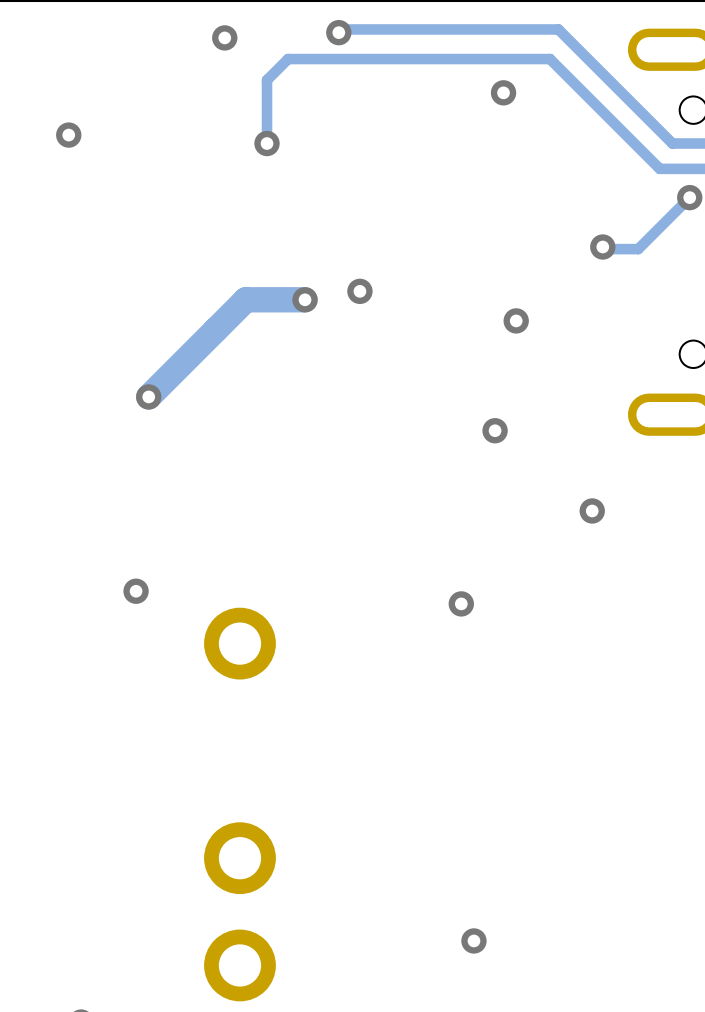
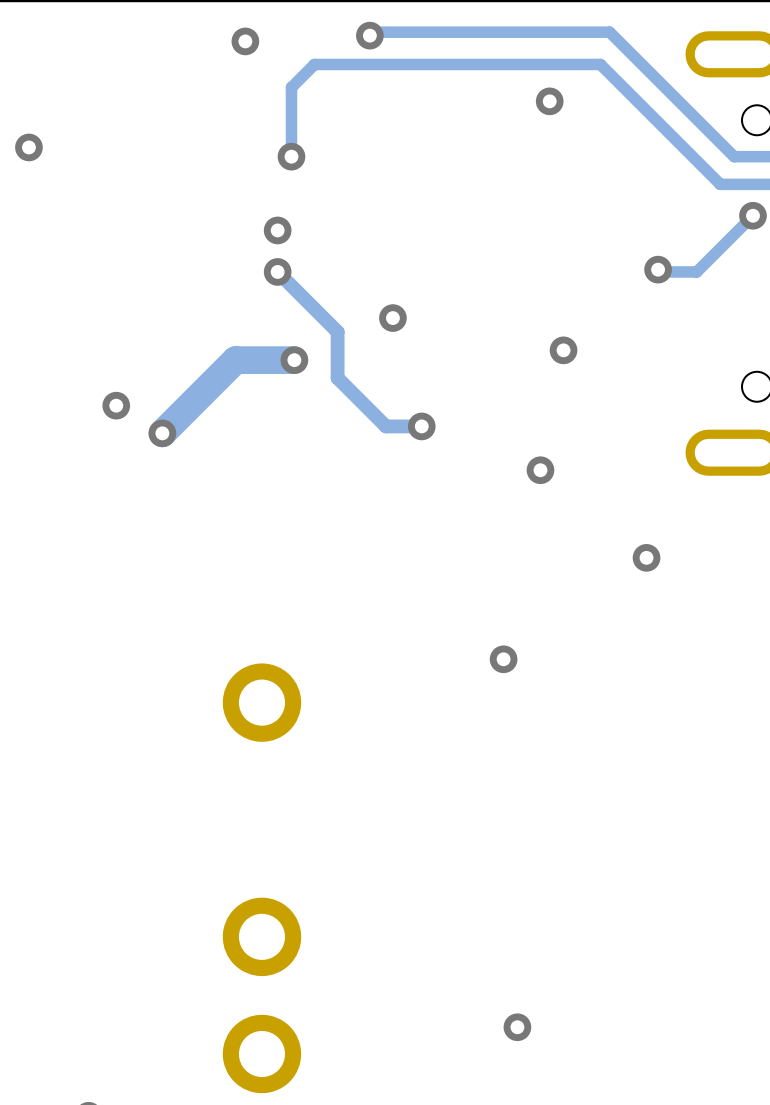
via: none -> (28, 147)
via: (68, 135) -> none
via: none -> (277, 230)
track: none -> (277, 271) (337, 331) (337, 378) (386, 426) (421, 426)
via: none -> (277, 271)
track: (305, 299) (245, 299) (215, 329) -> (294, 360) (235, 360)
via: (305, 299) -> none
via: none -> (294, 360)
via: none -> (116, 405)
via: none -> (421, 426)
via: (136, 591) -> none

